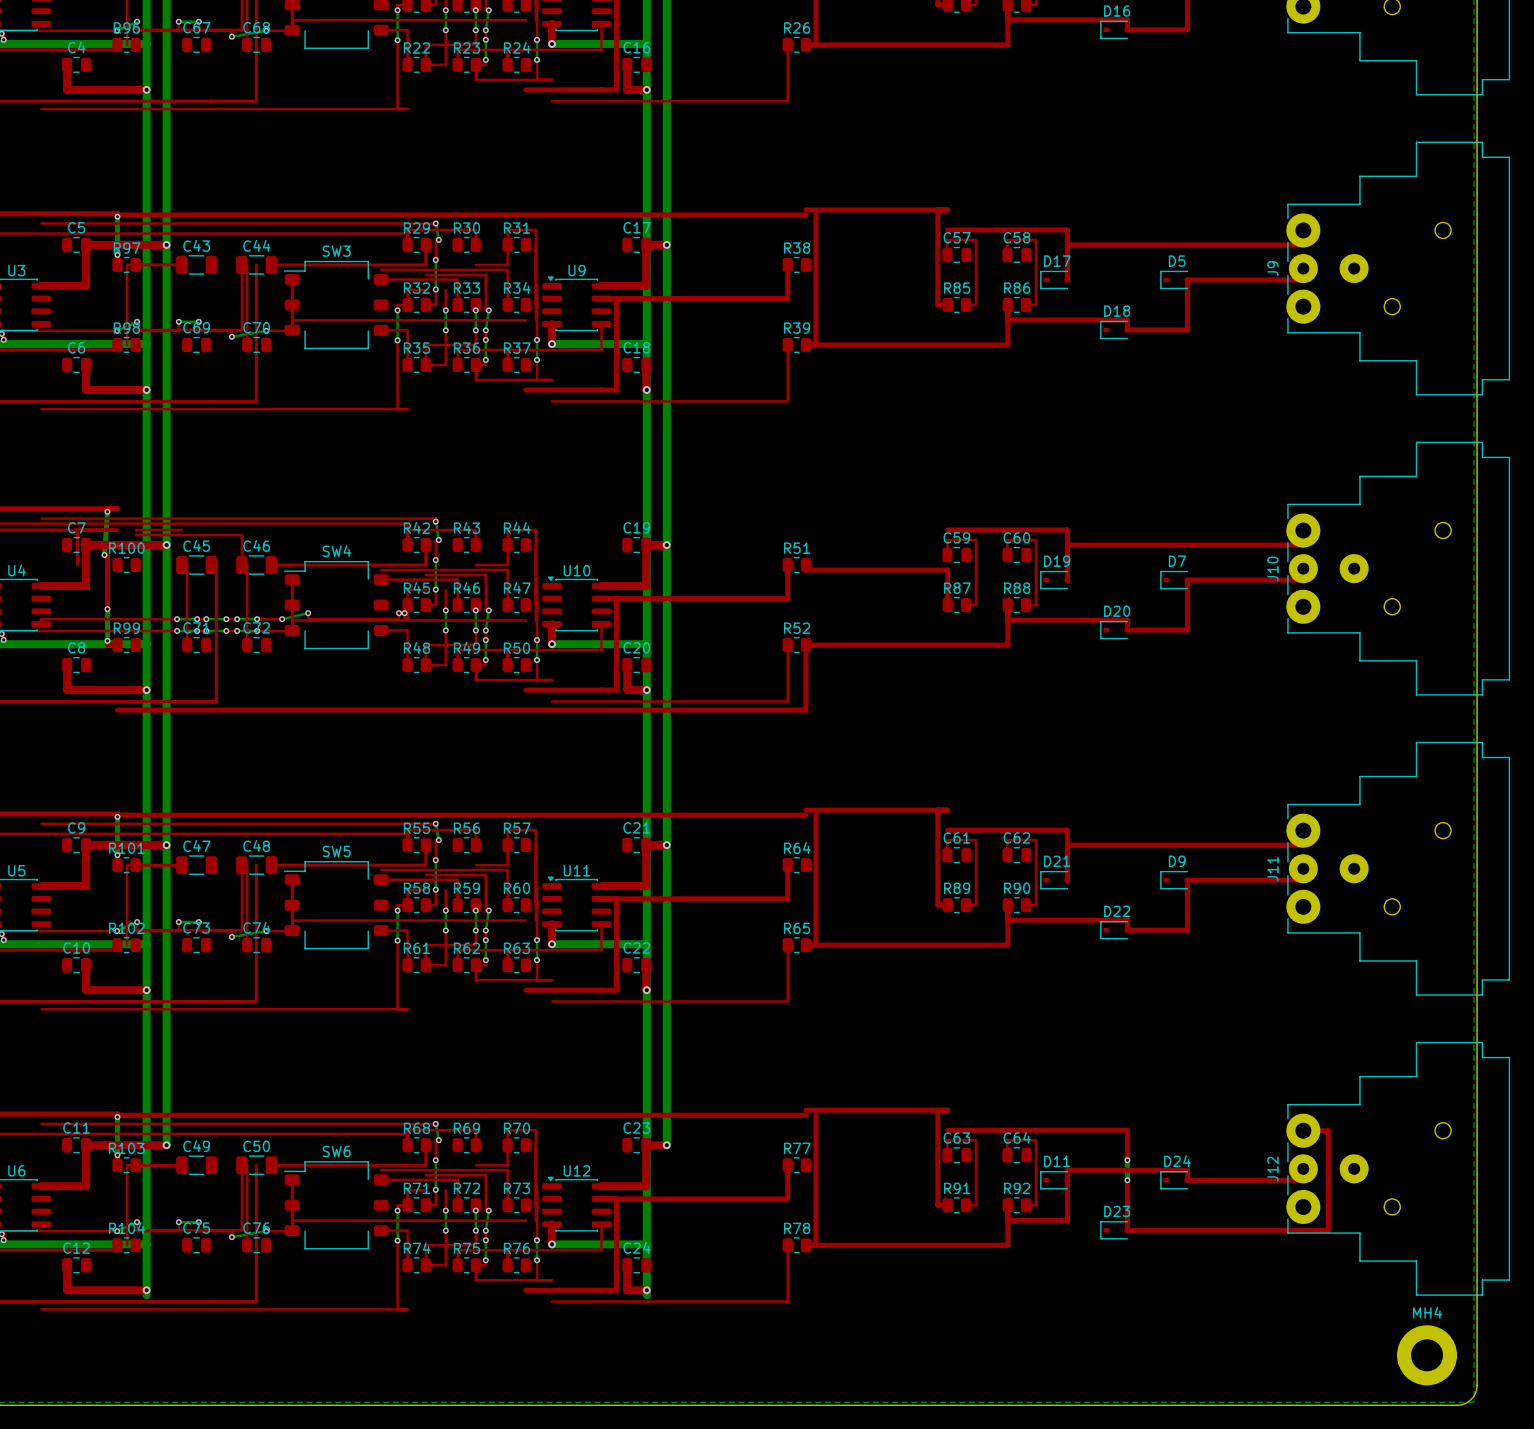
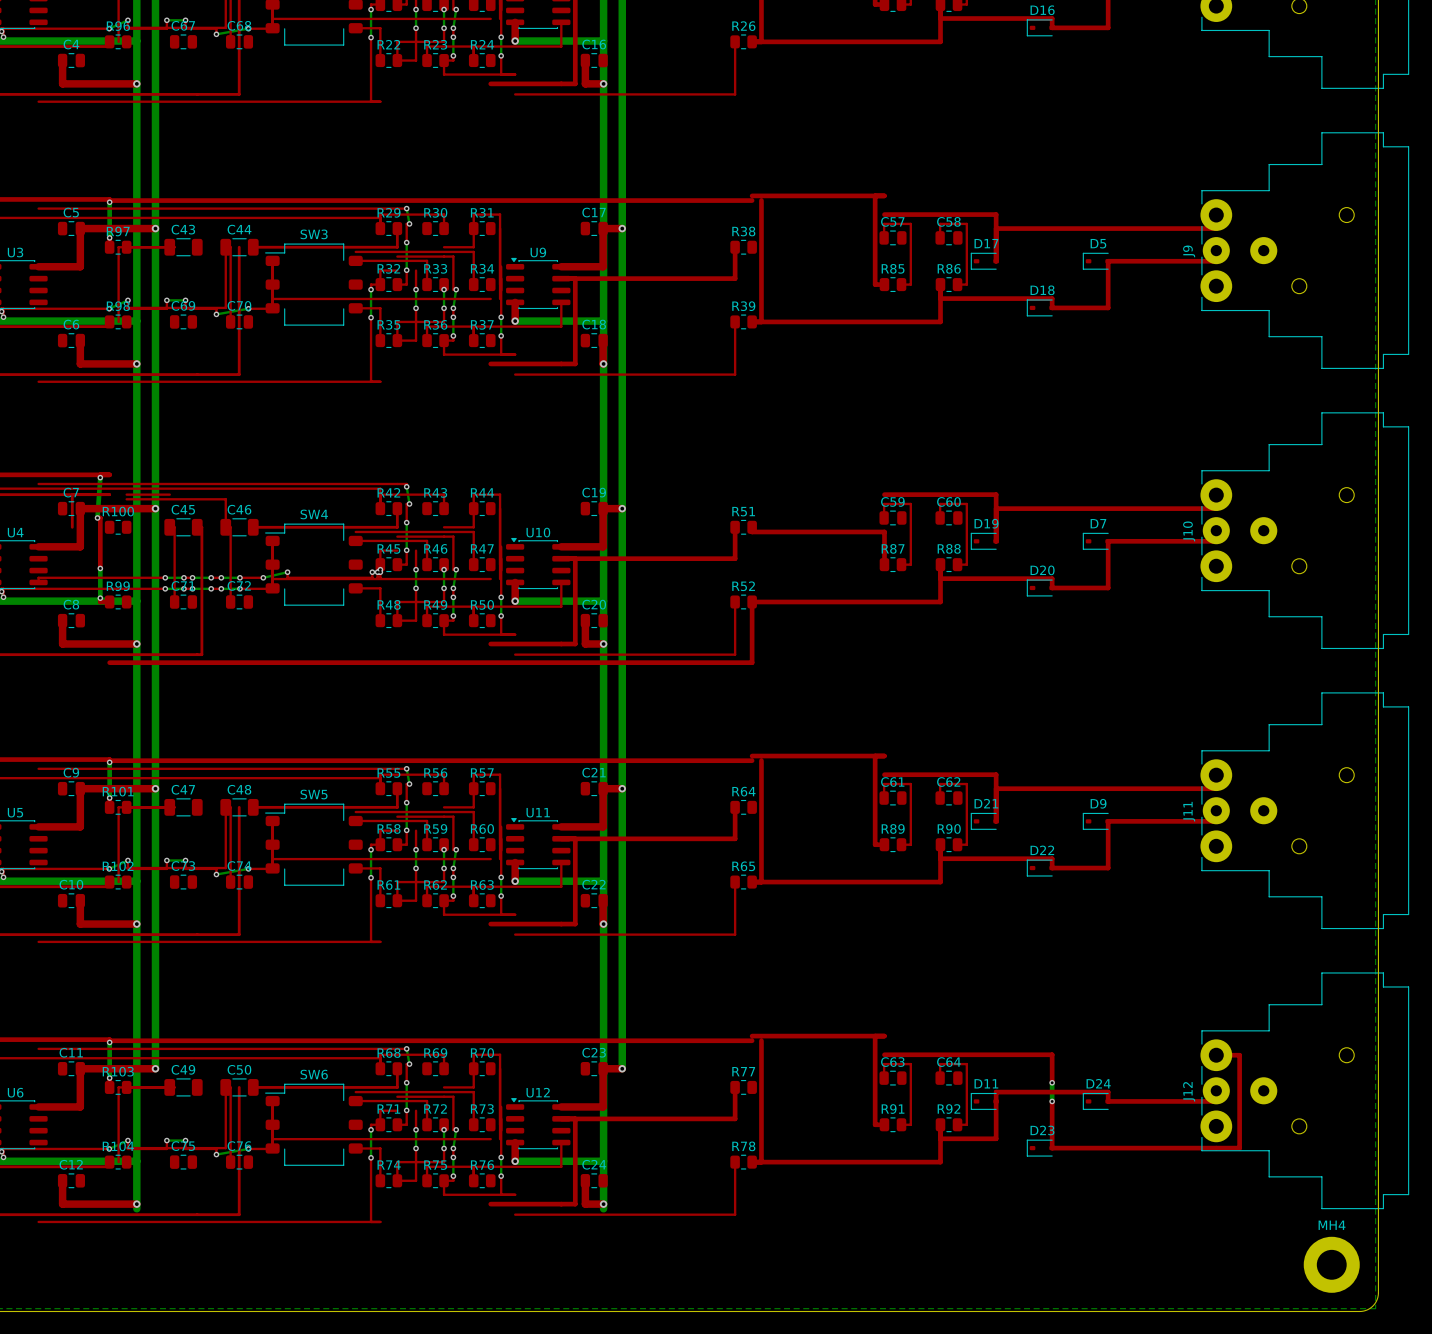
via: none -> (380, 569)
via: none -> (380, 572)

